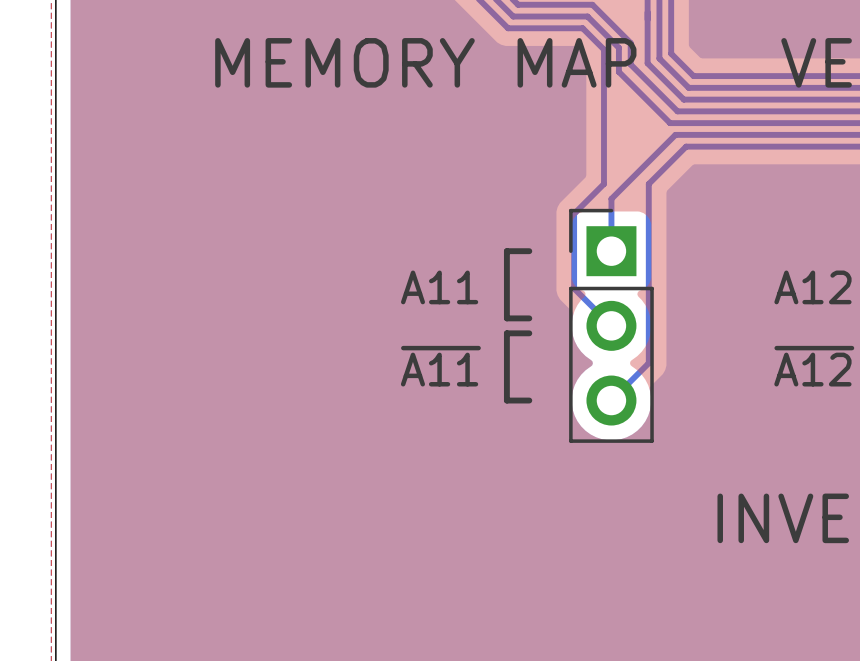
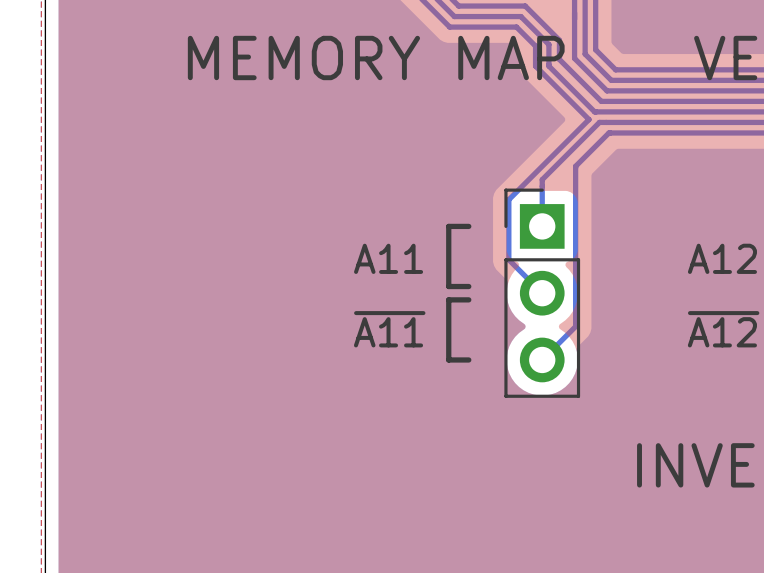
bottom track: (603, 71) (603, 183) (574, 213) (574, 221) -> (535, 66) (588, 119) (508, 199)

